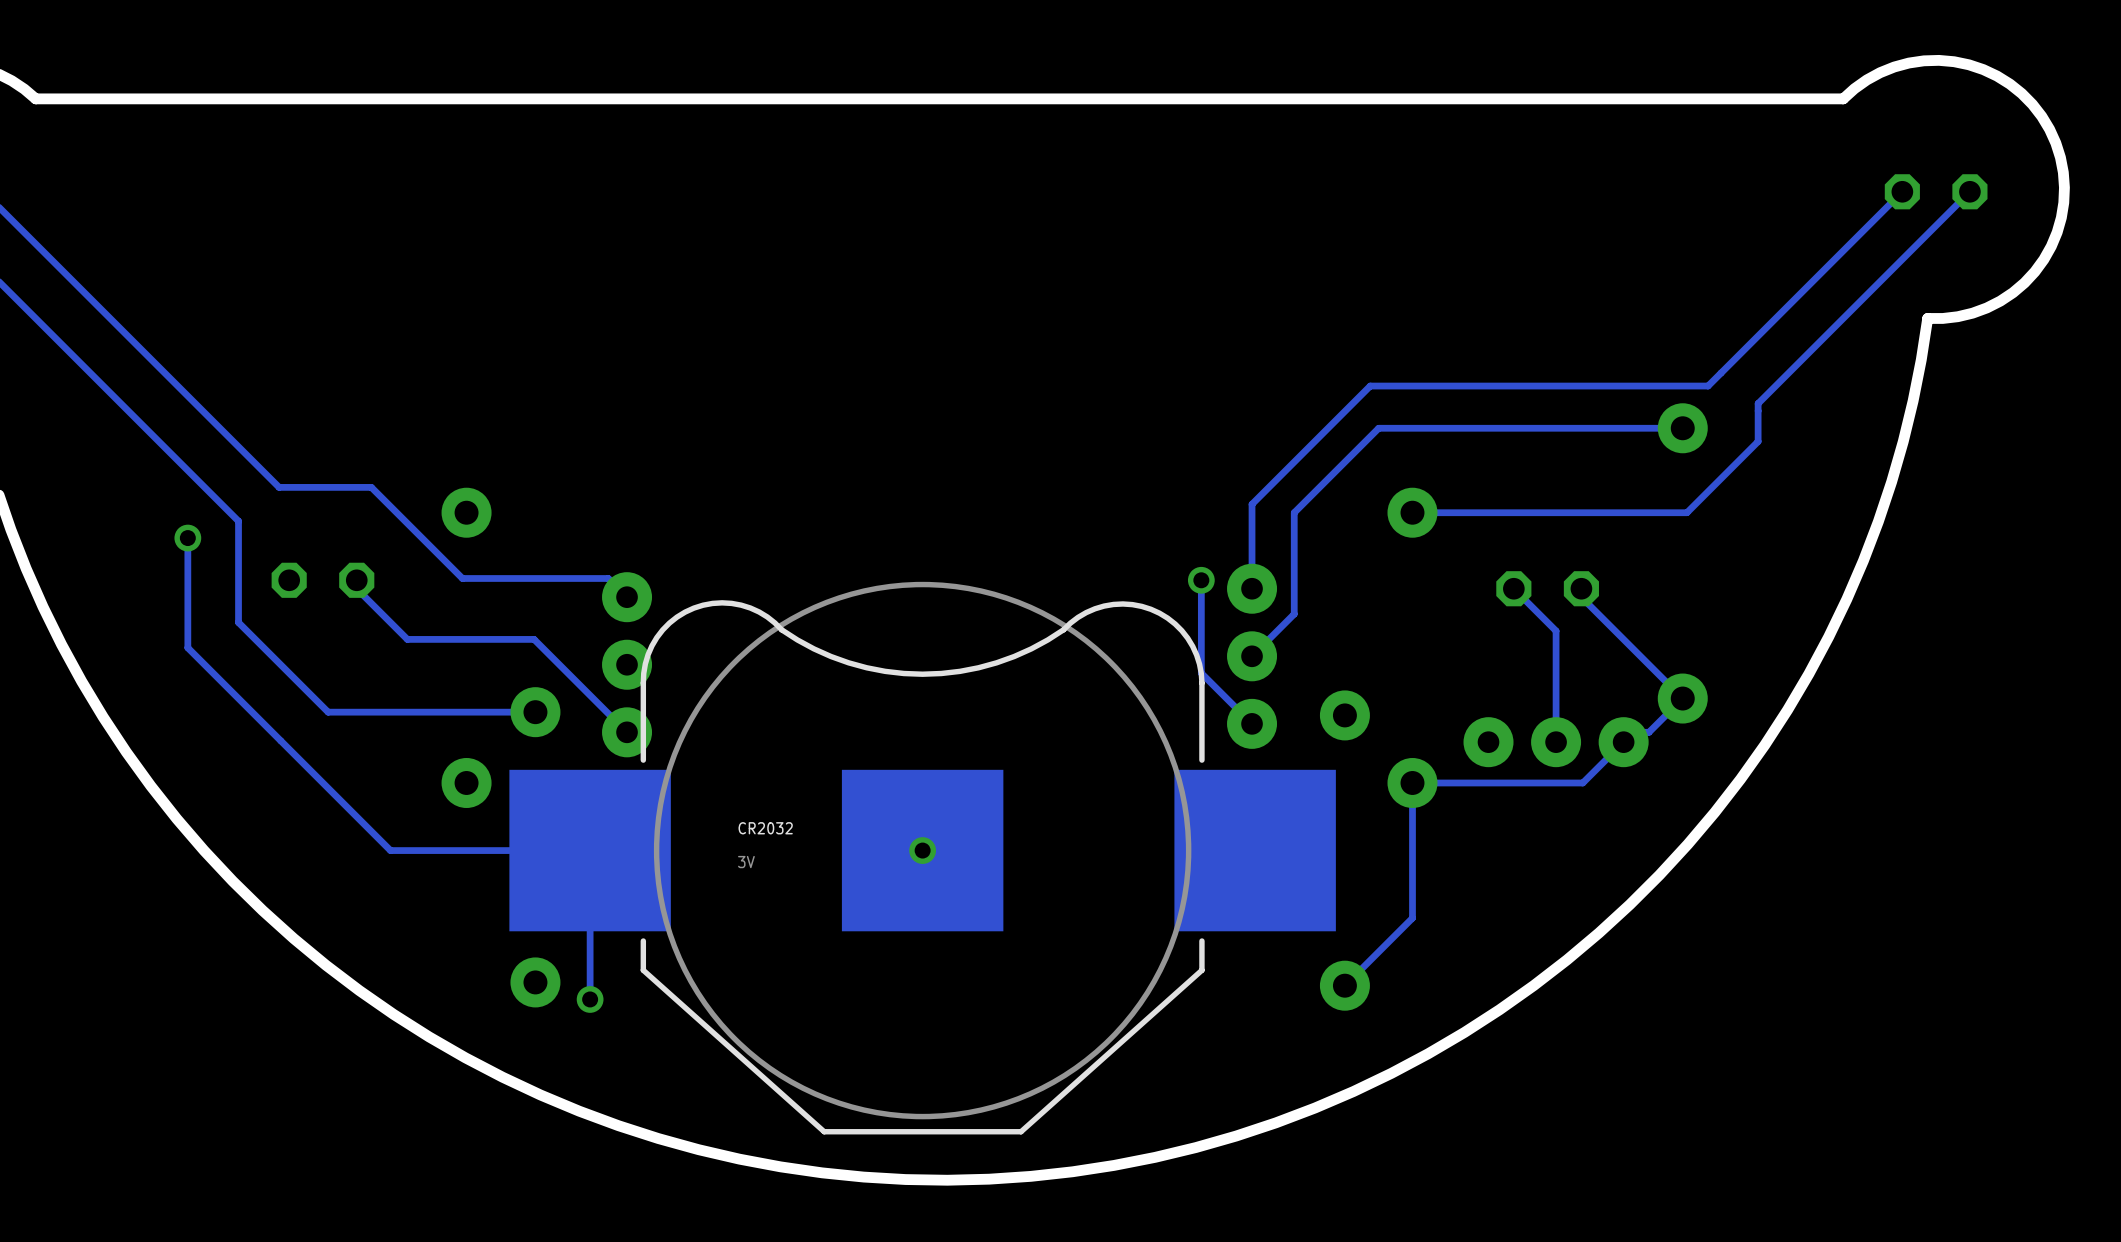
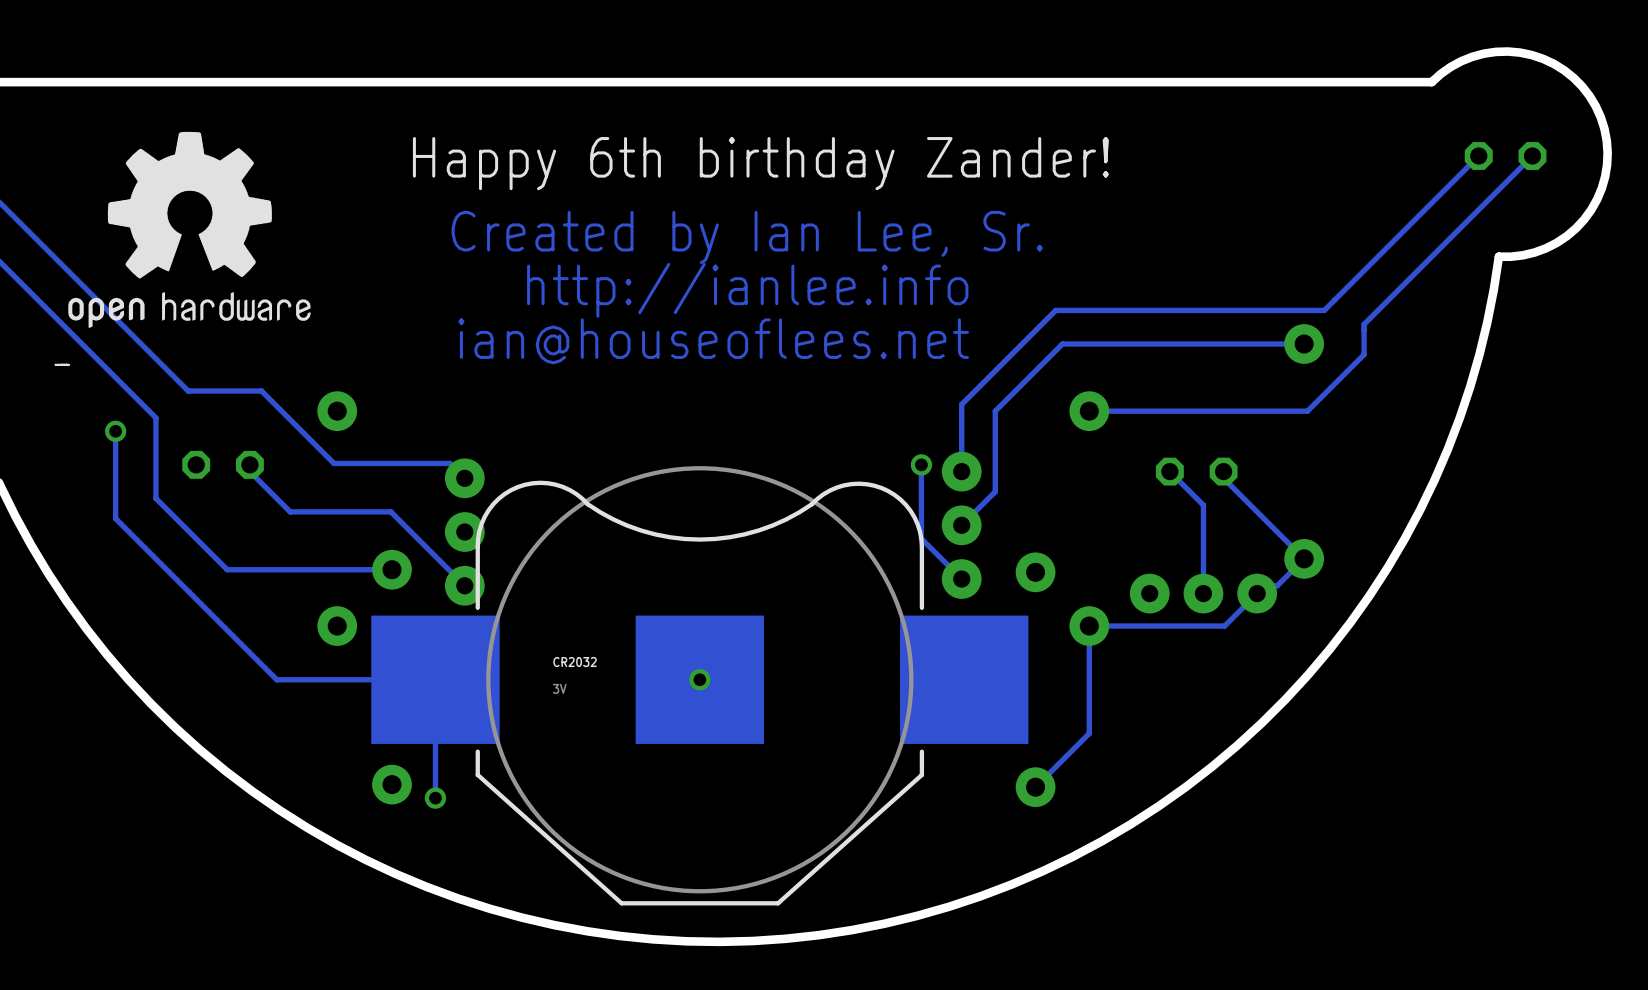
drawing: none -> [68, 131, 311, 328]
text: none -> Happy 6th birthday Zander! (760, 163)
text: none -> Created by Ian Lee, Sr. (747, 237)
text: none -> http://ianlee.info (747, 290)
text: none -> ian@houseoflees.net (713, 341)

